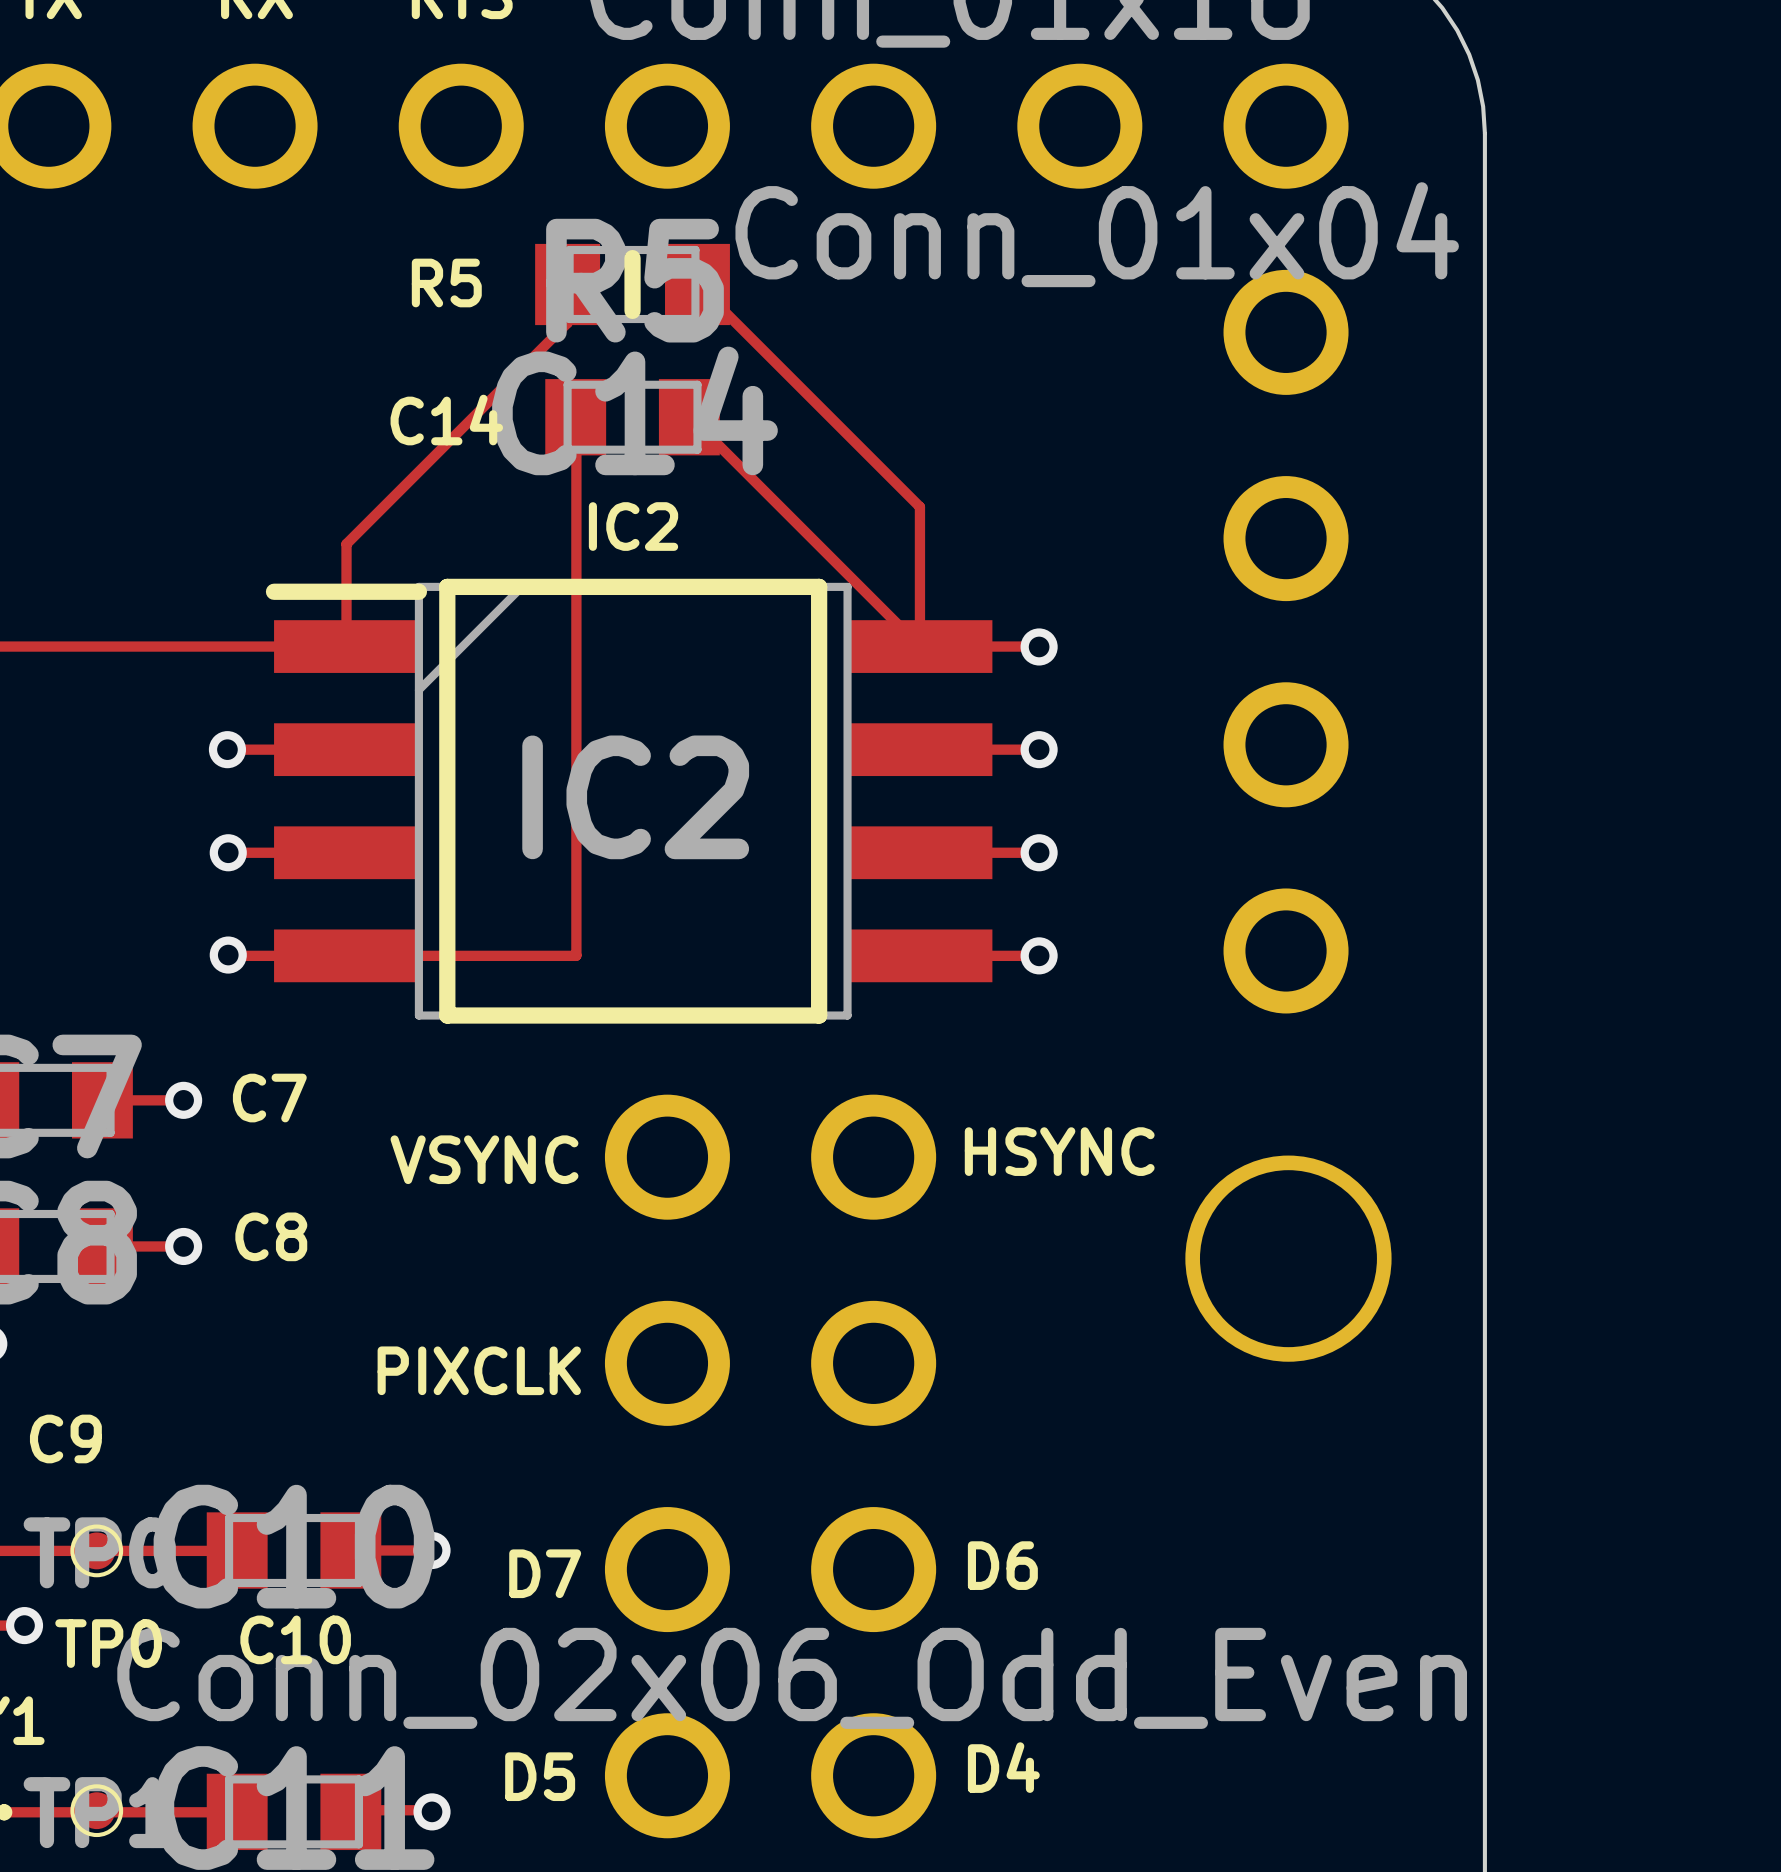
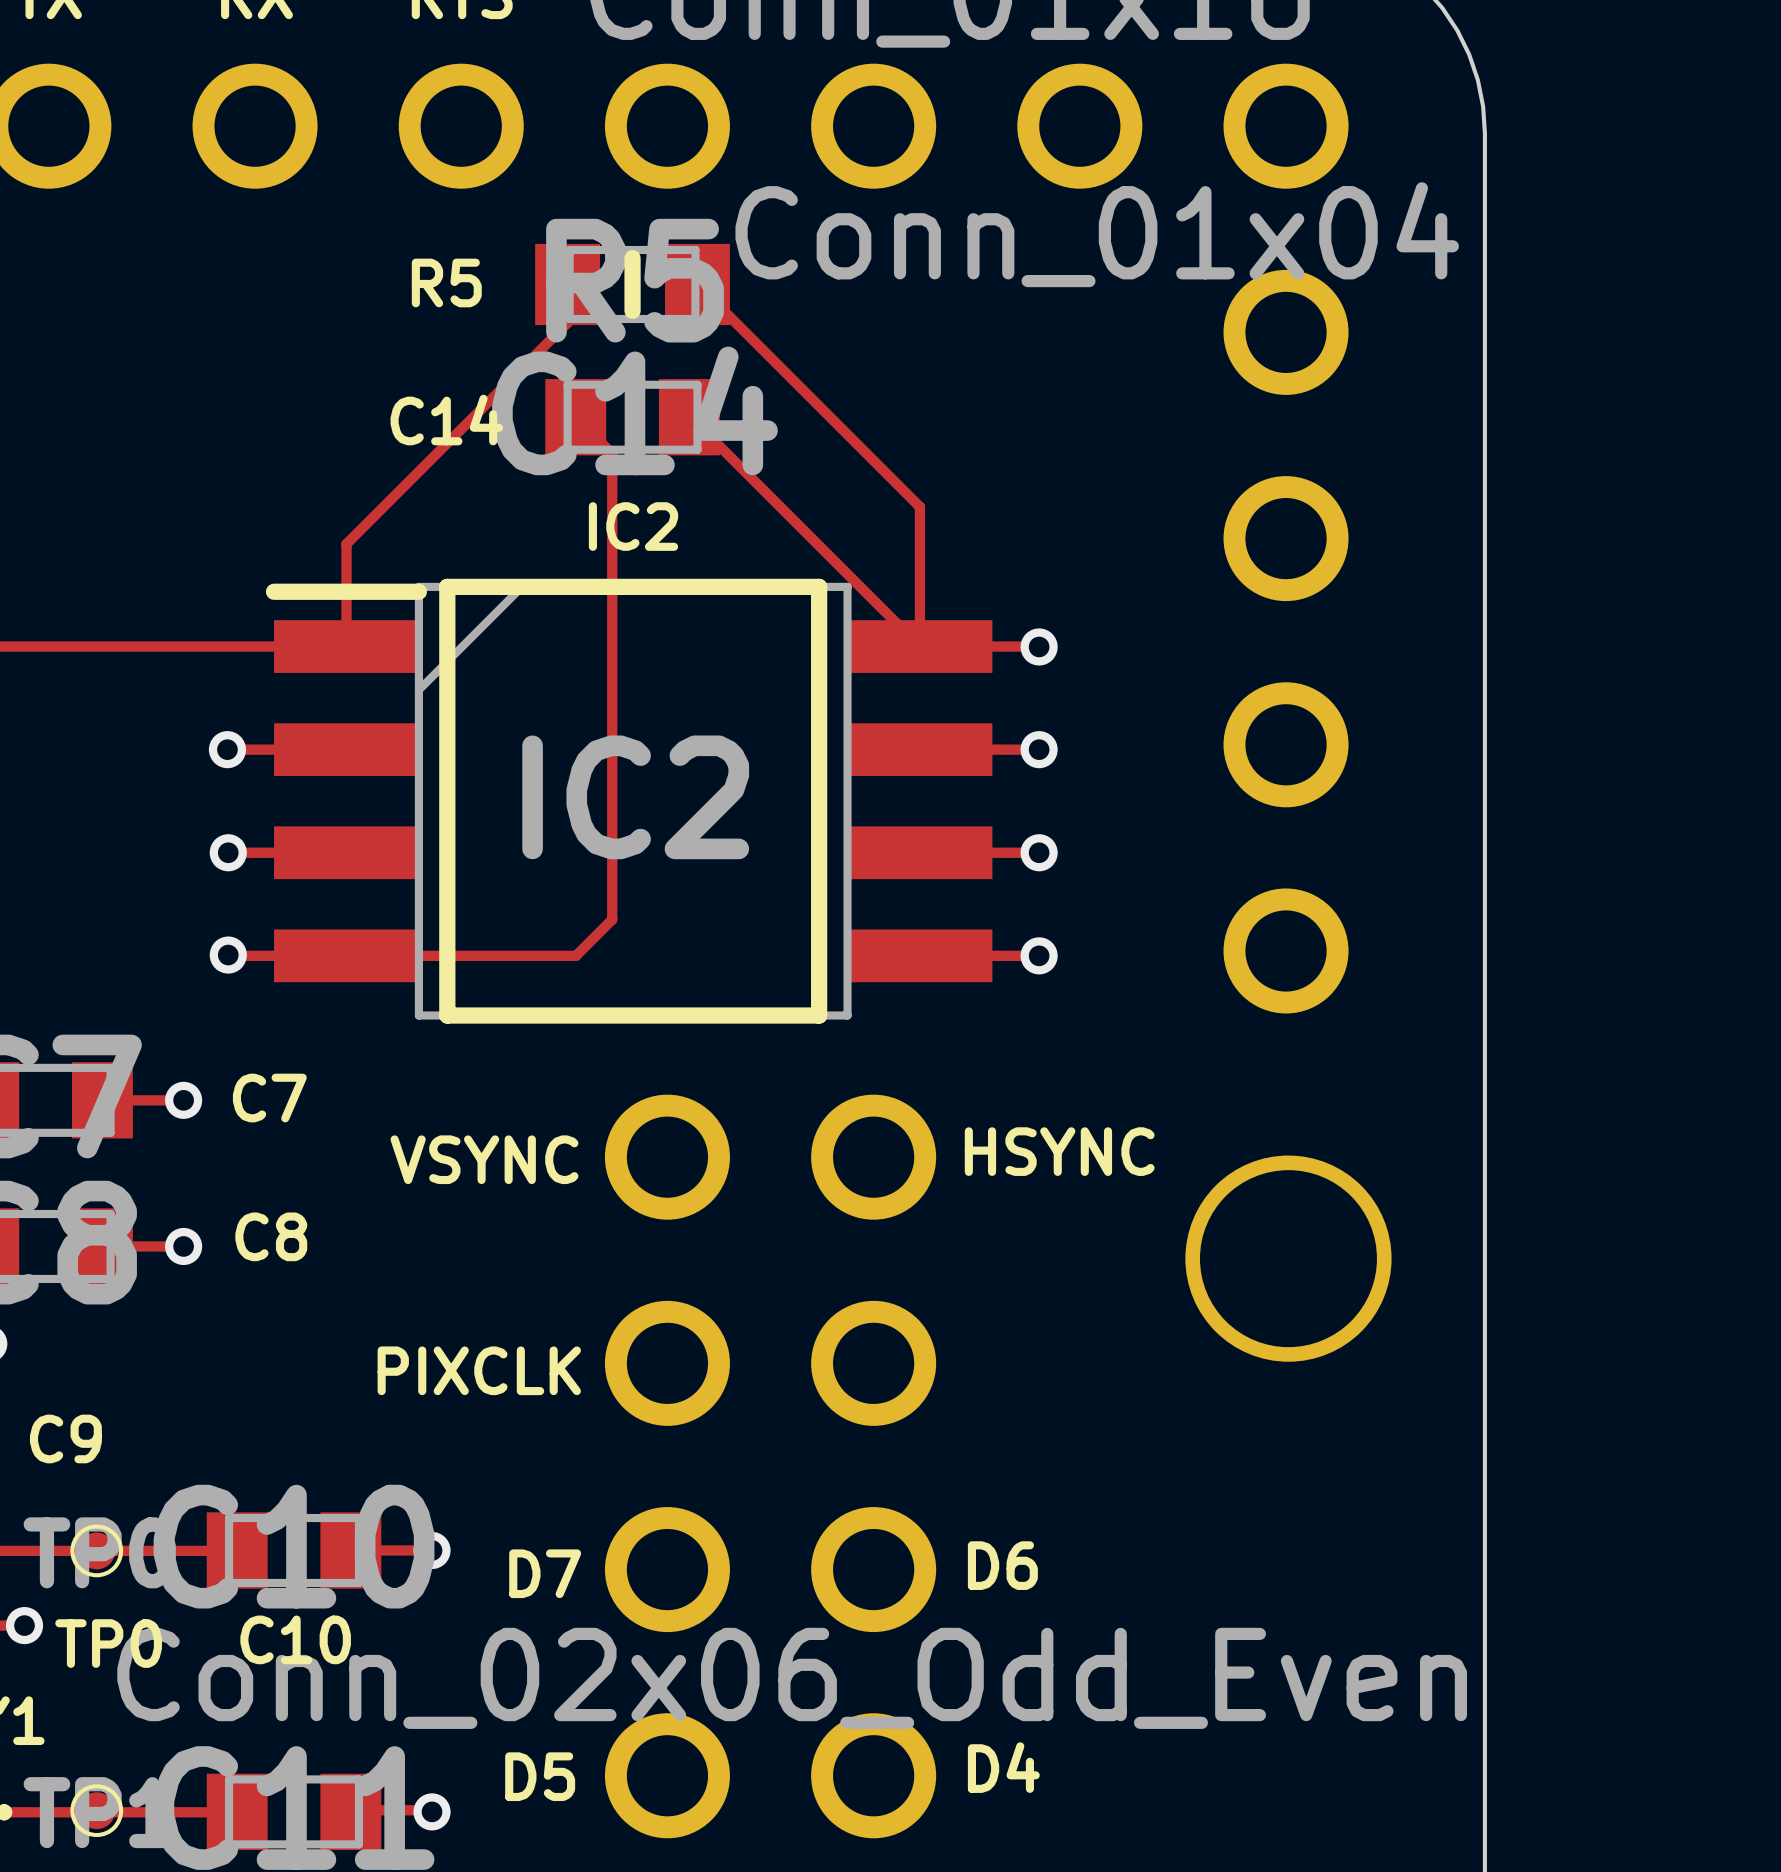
track: (576, 417) (576, 955) -> (576, 417) (612, 453) (612, 919) (576, 955)

